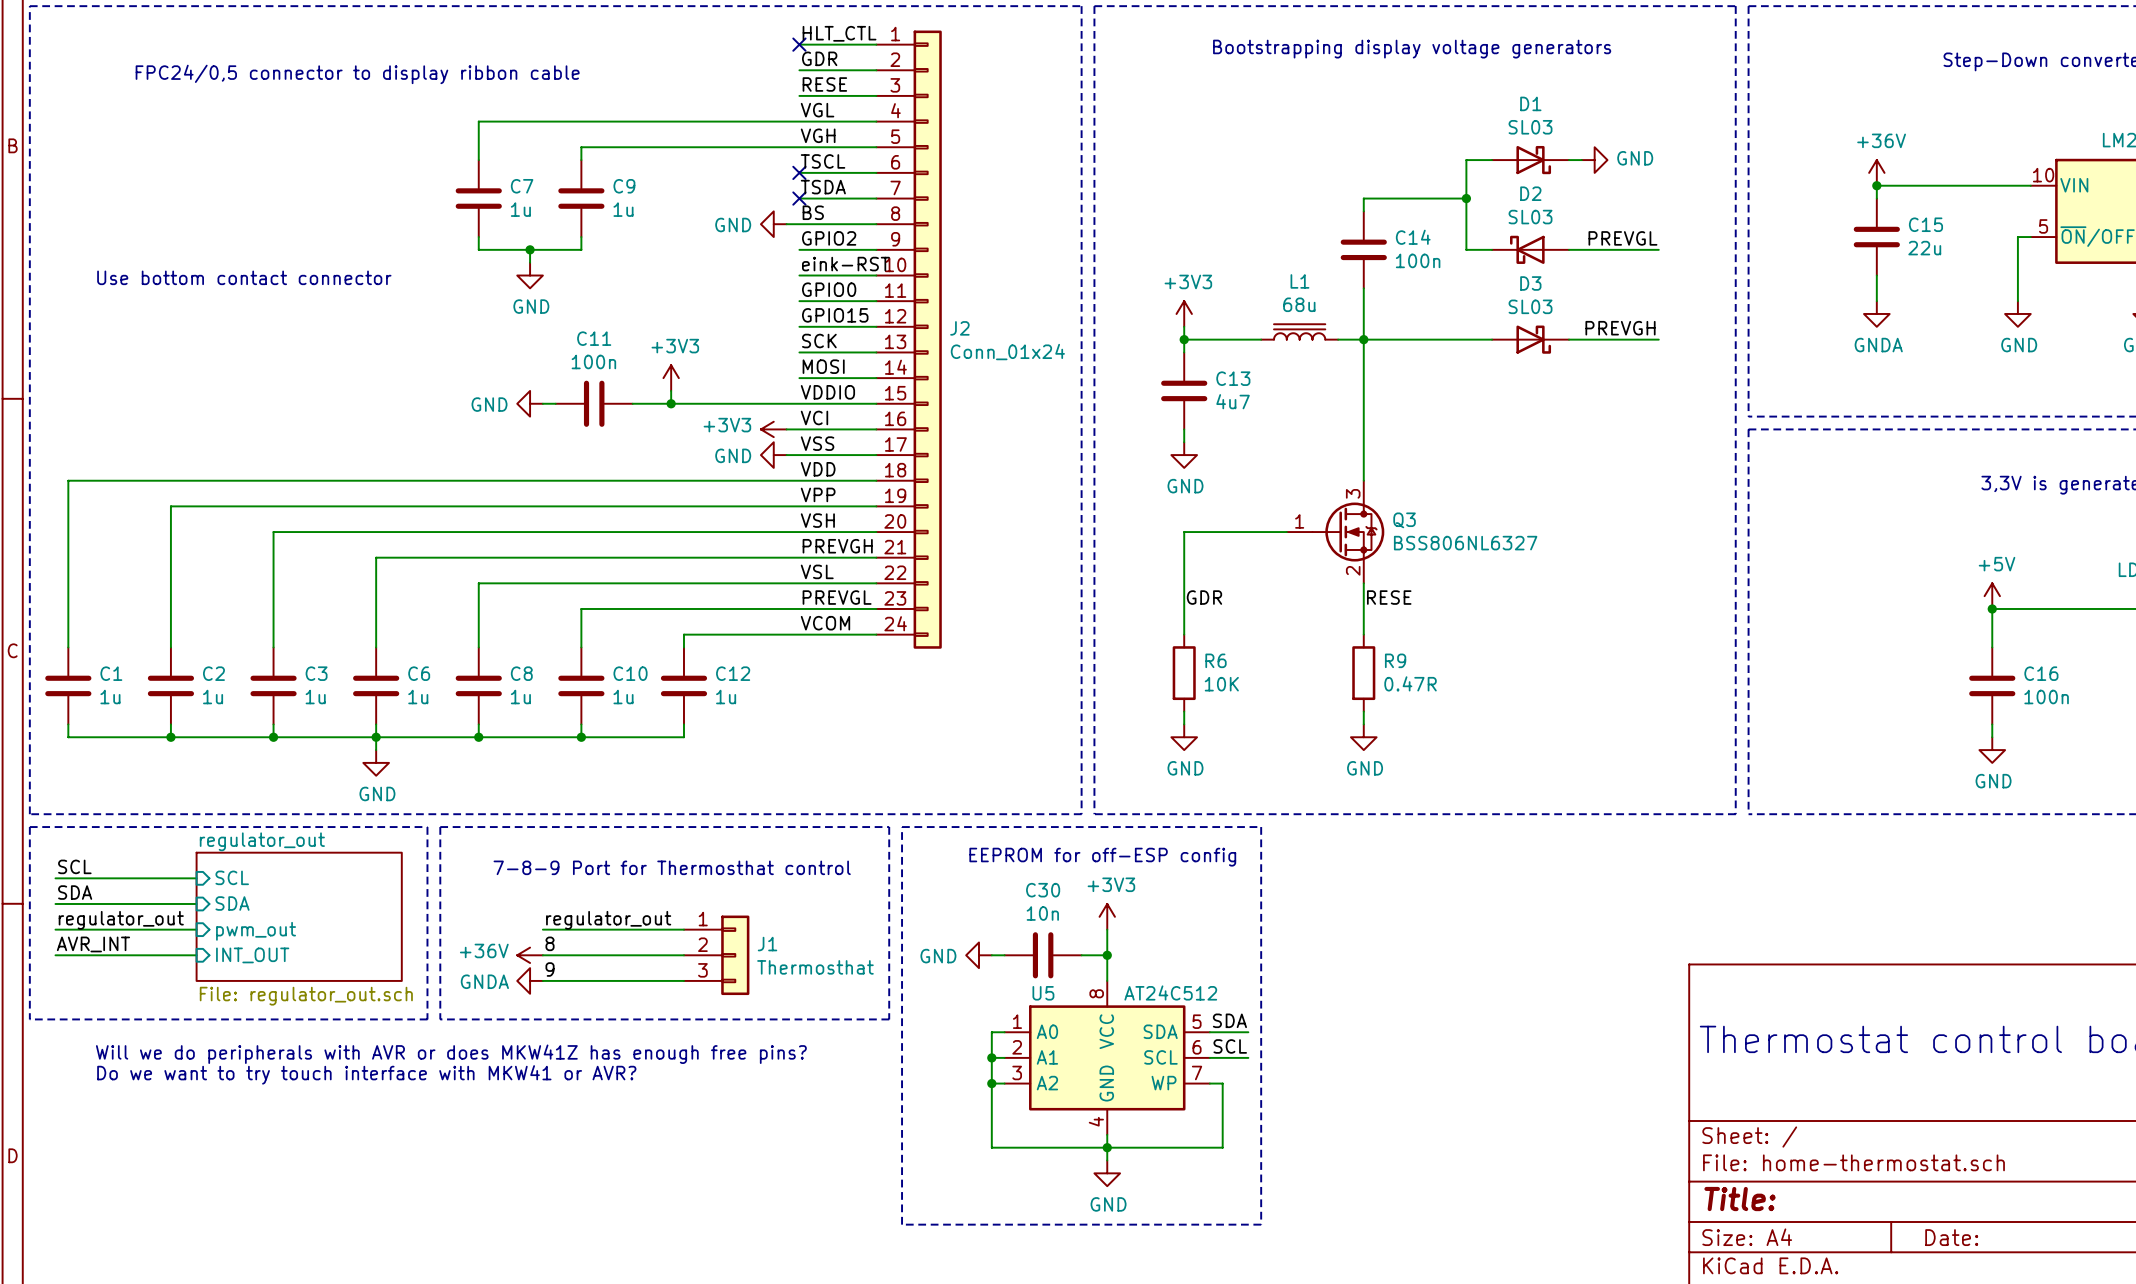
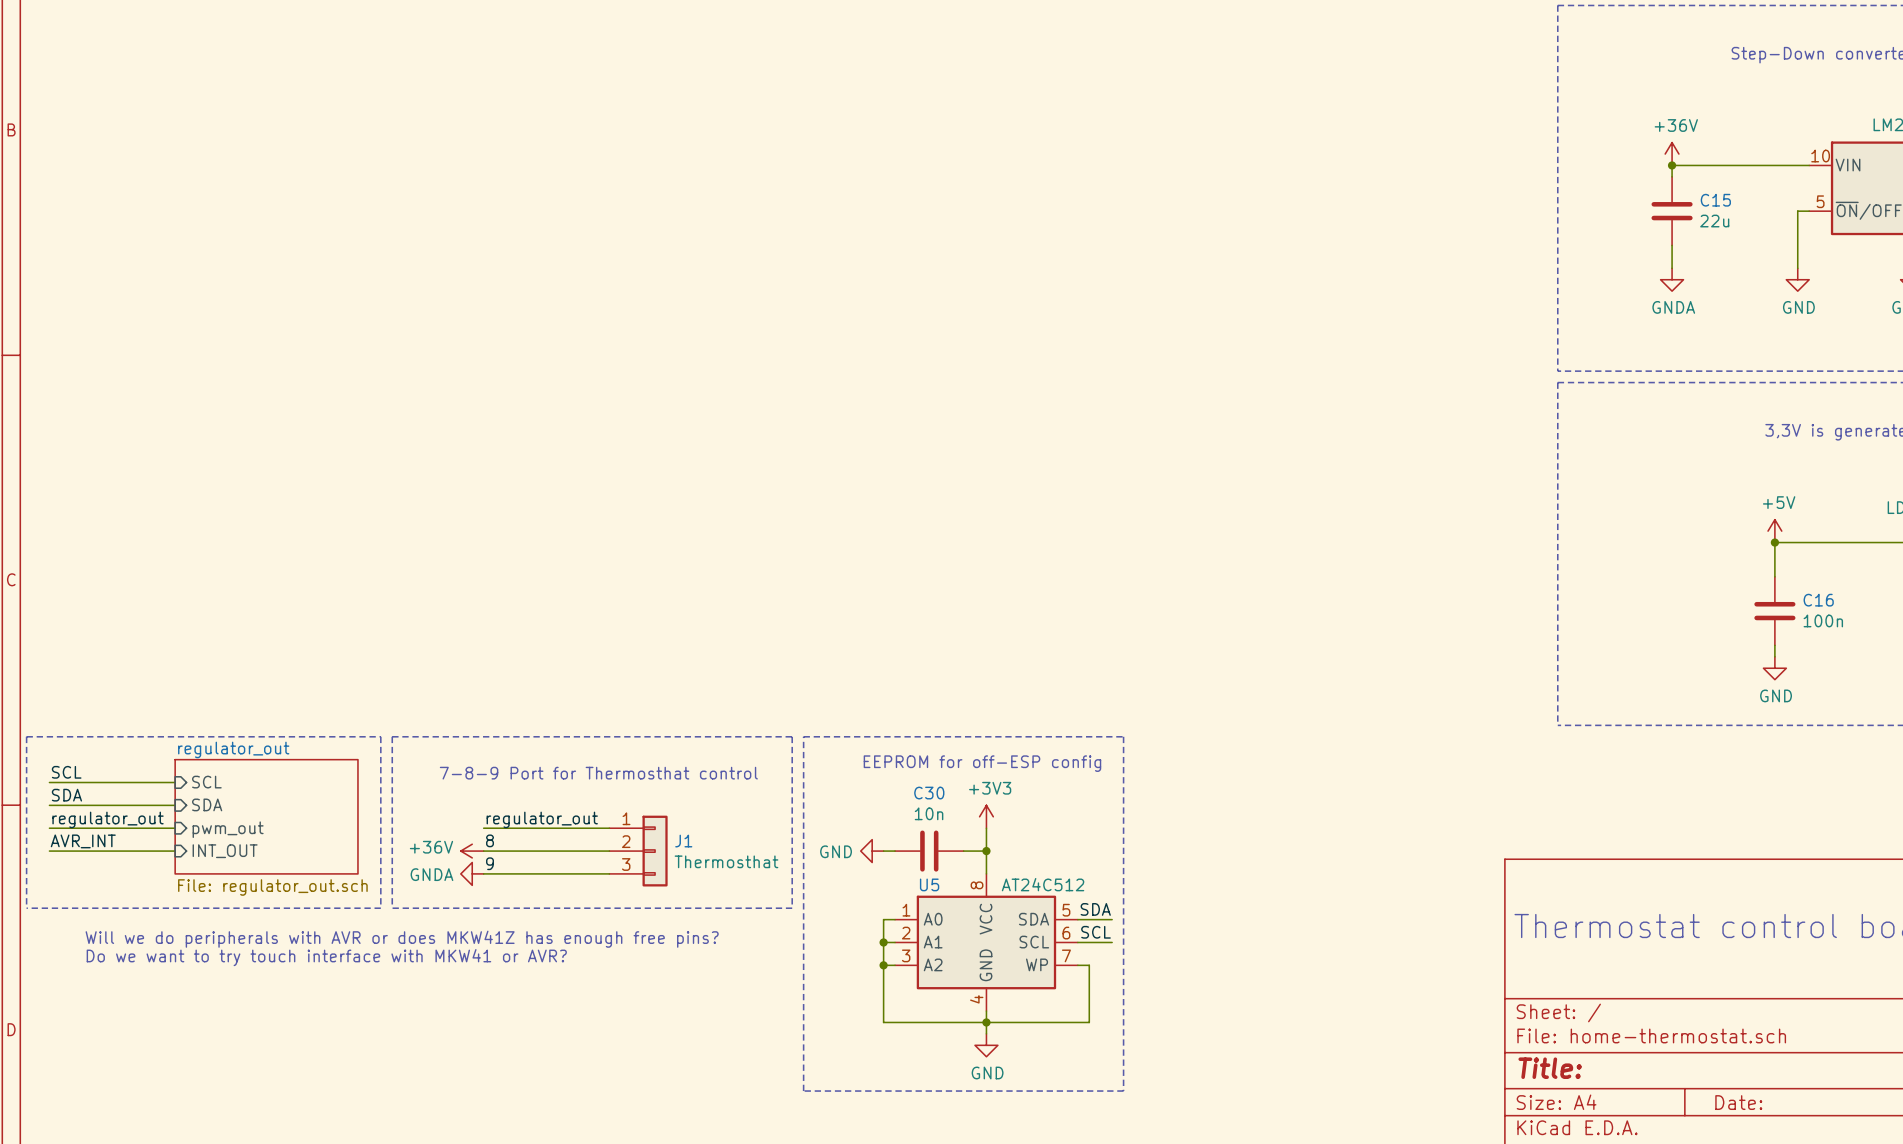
line: (29, 6) (29, 814) (1081, 814) (1081, 6) (29, 6) -> none
line: (1094, 6) (1735, 6) (1735, 814) (1094, 814) (1094, 6) -> none
label: HLT_CTL (839, 33) -> none
wire: (799, 44) (876, 44) -> none
no-connect mark: (799, 44) -> none
text: Bootstrapping display voltage generators (1412, 49) -> none
label: GDR (819, 58) -> none
wire: (799, 70) (876, 70) -> none
text: FPC24/0,5 connector to display ribbon cable (357, 74) -> none
label: RESE (824, 84) -> none
wire: (799, 95) (876, 95) -> none
label: VGL (817, 110) -> none
wire: (876, 121) (478, 121) (478, 160) -> none
label: VGH (818, 135) -> none
wire: (876, 147) (581, 147) (581, 160) -> none
wire: (1492, 160) (1466, 160) (1466, 249) (1492, 249) -> none
D1: SL03 (1530, 160) -> none
wire: (1569, 160) (1581, 160) -> none
power symbol: GND (1594, 160) -> none
label: TSCL (823, 161) -> none
wire: (799, 172) (876, 172) -> none
no-connect mark: (799, 172) -> none
label: TSDA (823, 187) -> none
C7: 1u (478, 198) -> none
C9: 1u (581, 198) -> none
wire: (799, 198) (876, 198) -> none
no-connect mark: (799, 198) -> none
wire: (1466, 198) (1363, 198) (1363, 211) -> none
junction: (1466, 198) -> none
label: BS (813, 212) -> none
power symbol: GND (773, 224) -> none
wire: (786, 224) (876, 224) -> none
wire: (478, 237) (478, 249) (581, 249) (581, 237) -> none
label: GPIO2 (829, 238) -> none
label: PREVGL (1622, 238) -> none
wire: (530, 249) (530, 262) -> none
junction: (530, 249) -> none
wire: (799, 249) (876, 249) -> none
C14: 100n (1363, 249) -> none
D2: SL03 (1530, 249) -> none
wire: (1569, 249) (1658, 249) -> none
label: eink-RST (845, 264) -> none
power symbol: GND (530, 275) -> none
wire: (799, 275) (876, 275) -> none
text: Use bottom contact connector (244, 277) -> none
wire: (1363, 288) (1363, 480) -> none
label: GPIO0 (829, 289) -> none
wire: (799, 301) (876, 301) -> none
power symbol: +3V3 (1184, 313) -> none
label: GPIO15 (835, 315) -> none
wire: (799, 326) (876, 326) -> none
wire: (1184, 326) (1184, 352) -> none
label: PREVGH (1620, 328) -> none
L1: 68u (1299, 331) -> none
J2: Conn_01x24 (909, 339) -> none
wire: (1184, 339) (1261, 339) -> none
junction: (1184, 339) -> none
wire: (1338, 339) (1492, 339) -> none
junction: (1363, 339) -> none
D3: SL03 (1530, 339) -> none
wire: (1569, 339) (1658, 339) -> none
label: SCK (819, 341) -> none
wire: (799, 352) (876, 352) -> none
label: MOSI (823, 366) -> none
power symbol: +3V3 (671, 378) -> none
wire: (799, 378) (876, 378) -> none
wire: (671, 390) (671, 403) -> none
C13: 4u7 (1184, 390) -> none
label: VDDIO (827, 392) -> none
power symbol: GND (530, 403) -> none
wire: (542, 403) (555, 403) -> none
C11: 100n (594, 403) -> none
wire: (632, 403) (876, 403) -> none
junction: (671, 403) -> none
label: VCI (814, 417) -> none
power symbol: +3V3 (773, 429) -> none
wire: (786, 429) (876, 429) -> none
wire: (1184, 429) (1184, 442) -> none
label: VSS (817, 443) -> none
power symbol: GND (773, 455) -> none
wire: (786, 455) (876, 455) -> none
power symbol: GND (1184, 455) -> none
label: VDD (818, 469) -> none
wire: (876, 480) (68, 480) (68, 647) -> none
label: VPP (818, 494) -> none
wire: (876, 506) (170, 506) (170, 647) -> none
label: VSH (817, 520) -> none
wire: (876, 532) (273, 532) (273, 647) -> none
wire: (1286, 532) (1184, 532) (1184, 634) -> none
Q3: BSS806NL6327 (1335, 532) -> none
label: PREVGH (837, 546) -> none
wire: (876, 557) (376, 557) (376, 647) -> none
label: VSL (817, 571) -> none
wire: (876, 583) (478, 583) (478, 647) -> none
wire: (1363, 583) (1363, 634) -> none
label: PREVGL (837, 597) -> none
label: GDR (1204, 597) -> none
label: RESE (1389, 597) -> none
wire: (876, 608) (581, 608) (581, 647) -> none
label: VCOM (825, 623) -> none
wire: (876, 634) (683, 634) (683, 647) -> none
R6: 10K (1184, 673) -> none
R9: 0.47R (1363, 673) -> none
C1: 1u (68, 685) -> none
C2: 1u (170, 685) -> none
C3: 1u (273, 685) -> none
C6: 1u (376, 685) -> none
C8: 1u (478, 685) -> none
C10: 1u (581, 685) -> none
C12: 1u (683, 685) -> none
wire: (1184, 711) (1184, 724) -> none
wire: (1363, 711) (1363, 724) -> none
wire: (68, 724) (68, 737) (683, 737) (683, 724) -> none
wire: (170, 724) (170, 737) -> none
wire: (273, 724) (273, 737) -> none
wire: (376, 724) (376, 750) -> none
wire: (478, 724) (478, 737) -> none
wire: (581, 724) (581, 737) -> none
junction: (170, 737) -> none
junction: (273, 737) -> none
junction: (376, 737) -> none
junction: (478, 737) -> none
junction: (581, 737) -> none
power symbol: GND (1184, 737) -> none
power symbol: GND (1363, 737) -> none
power symbol: GND (376, 762) -> none

